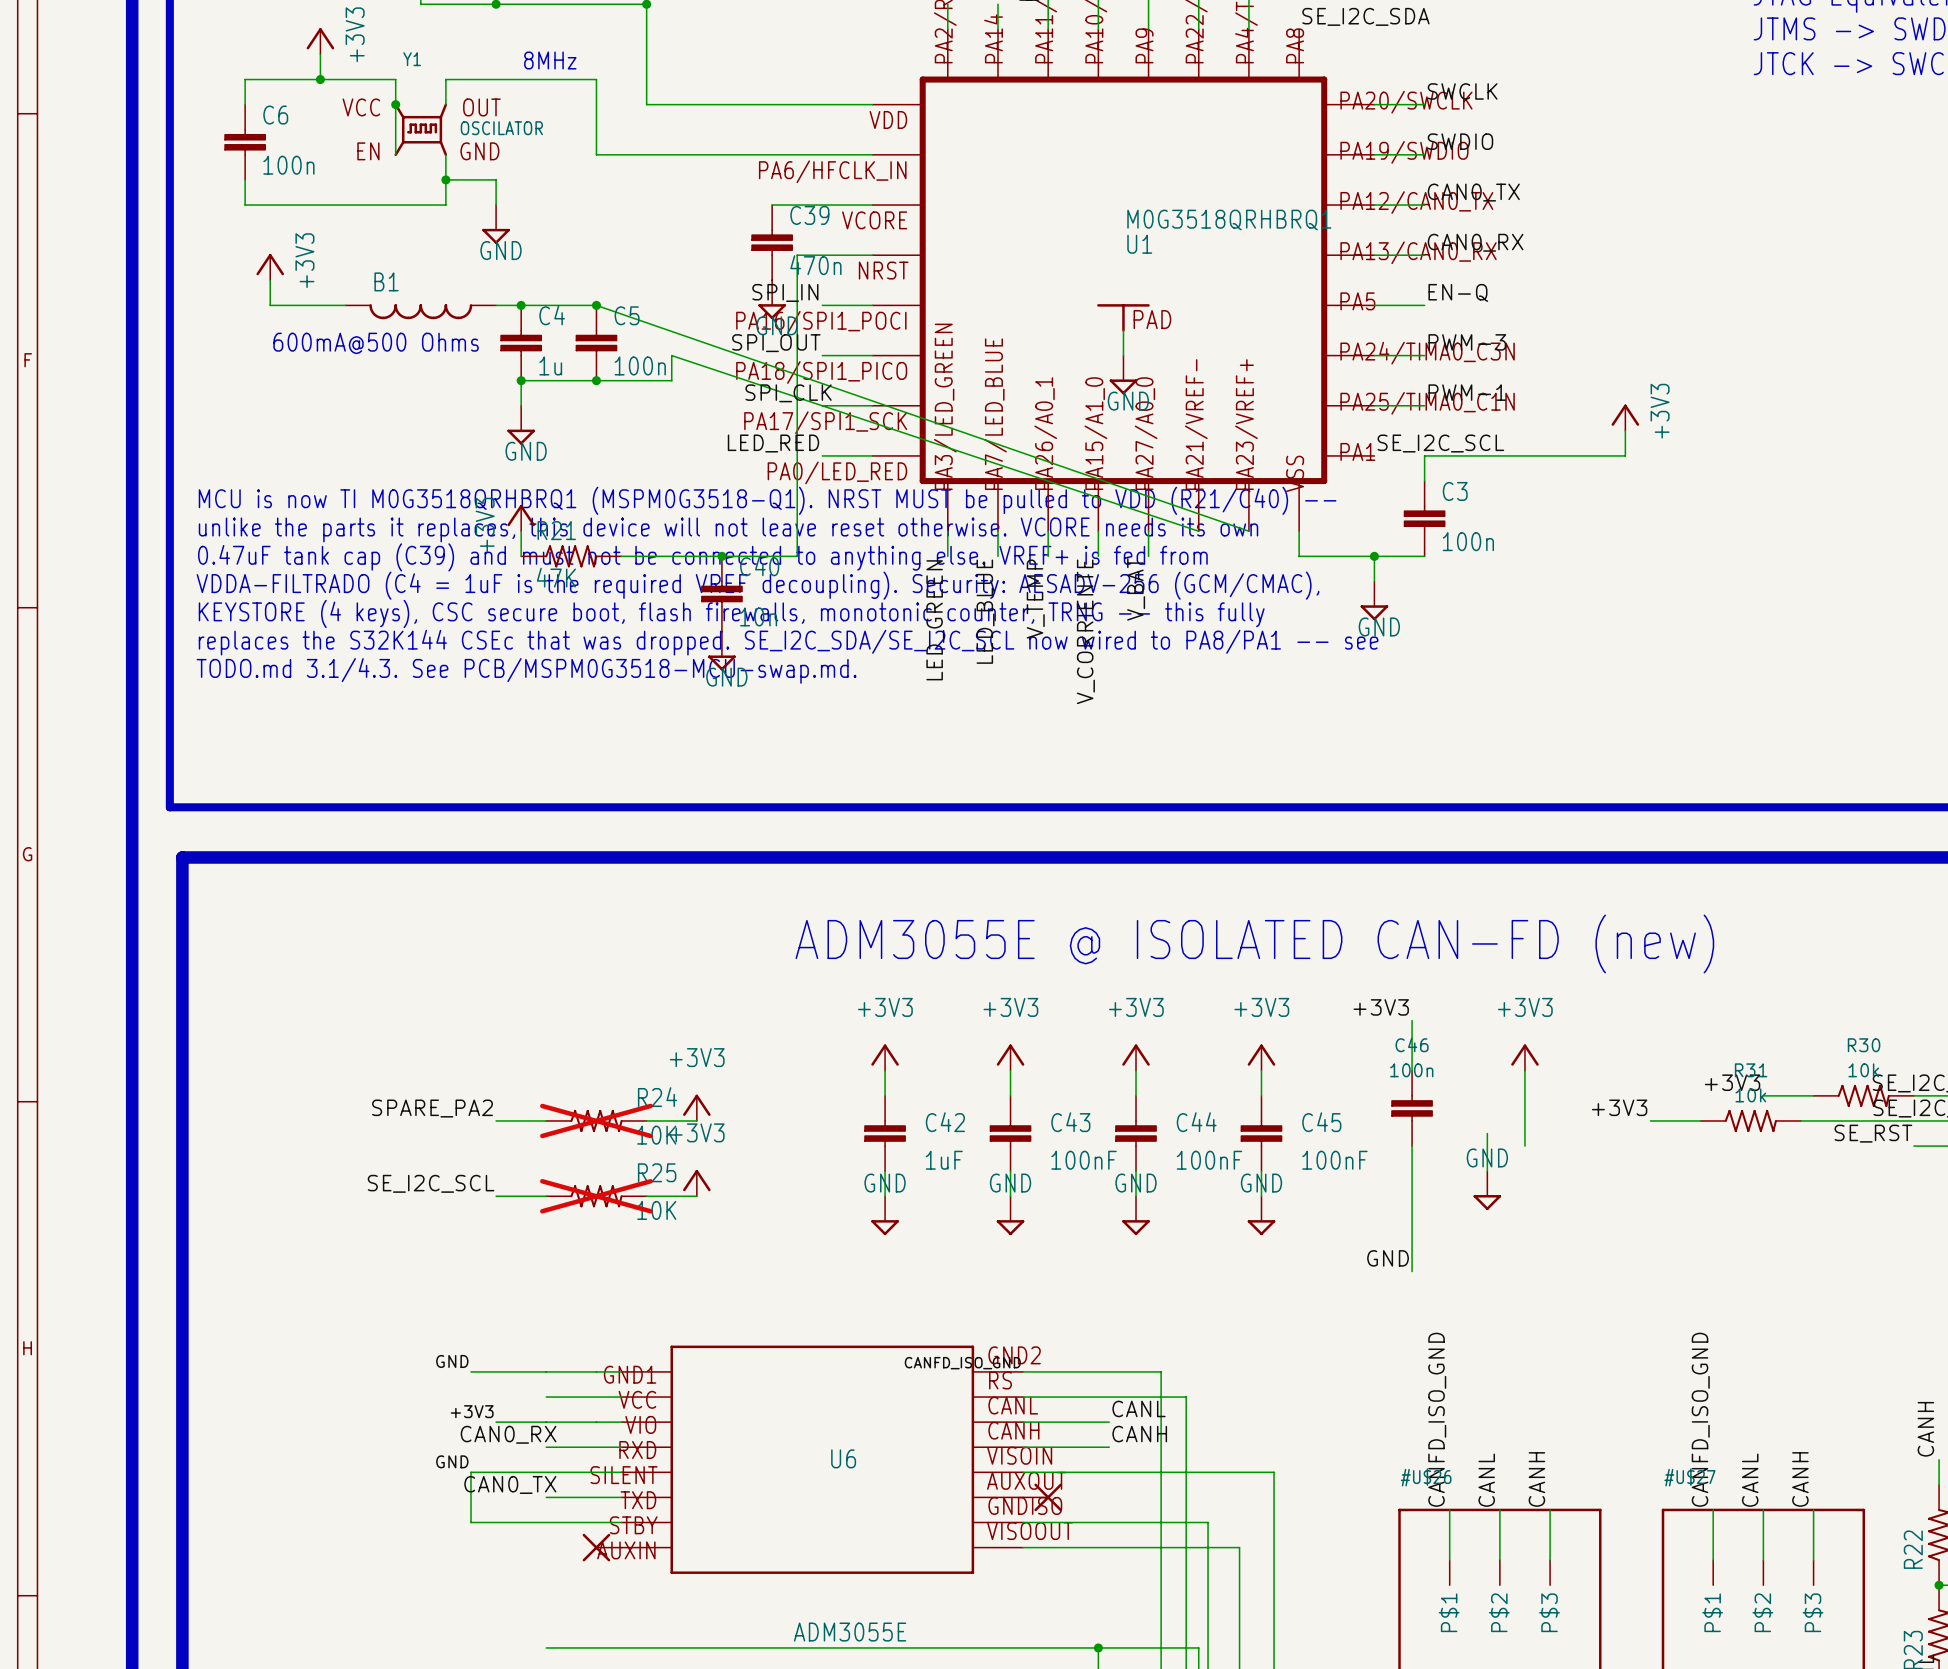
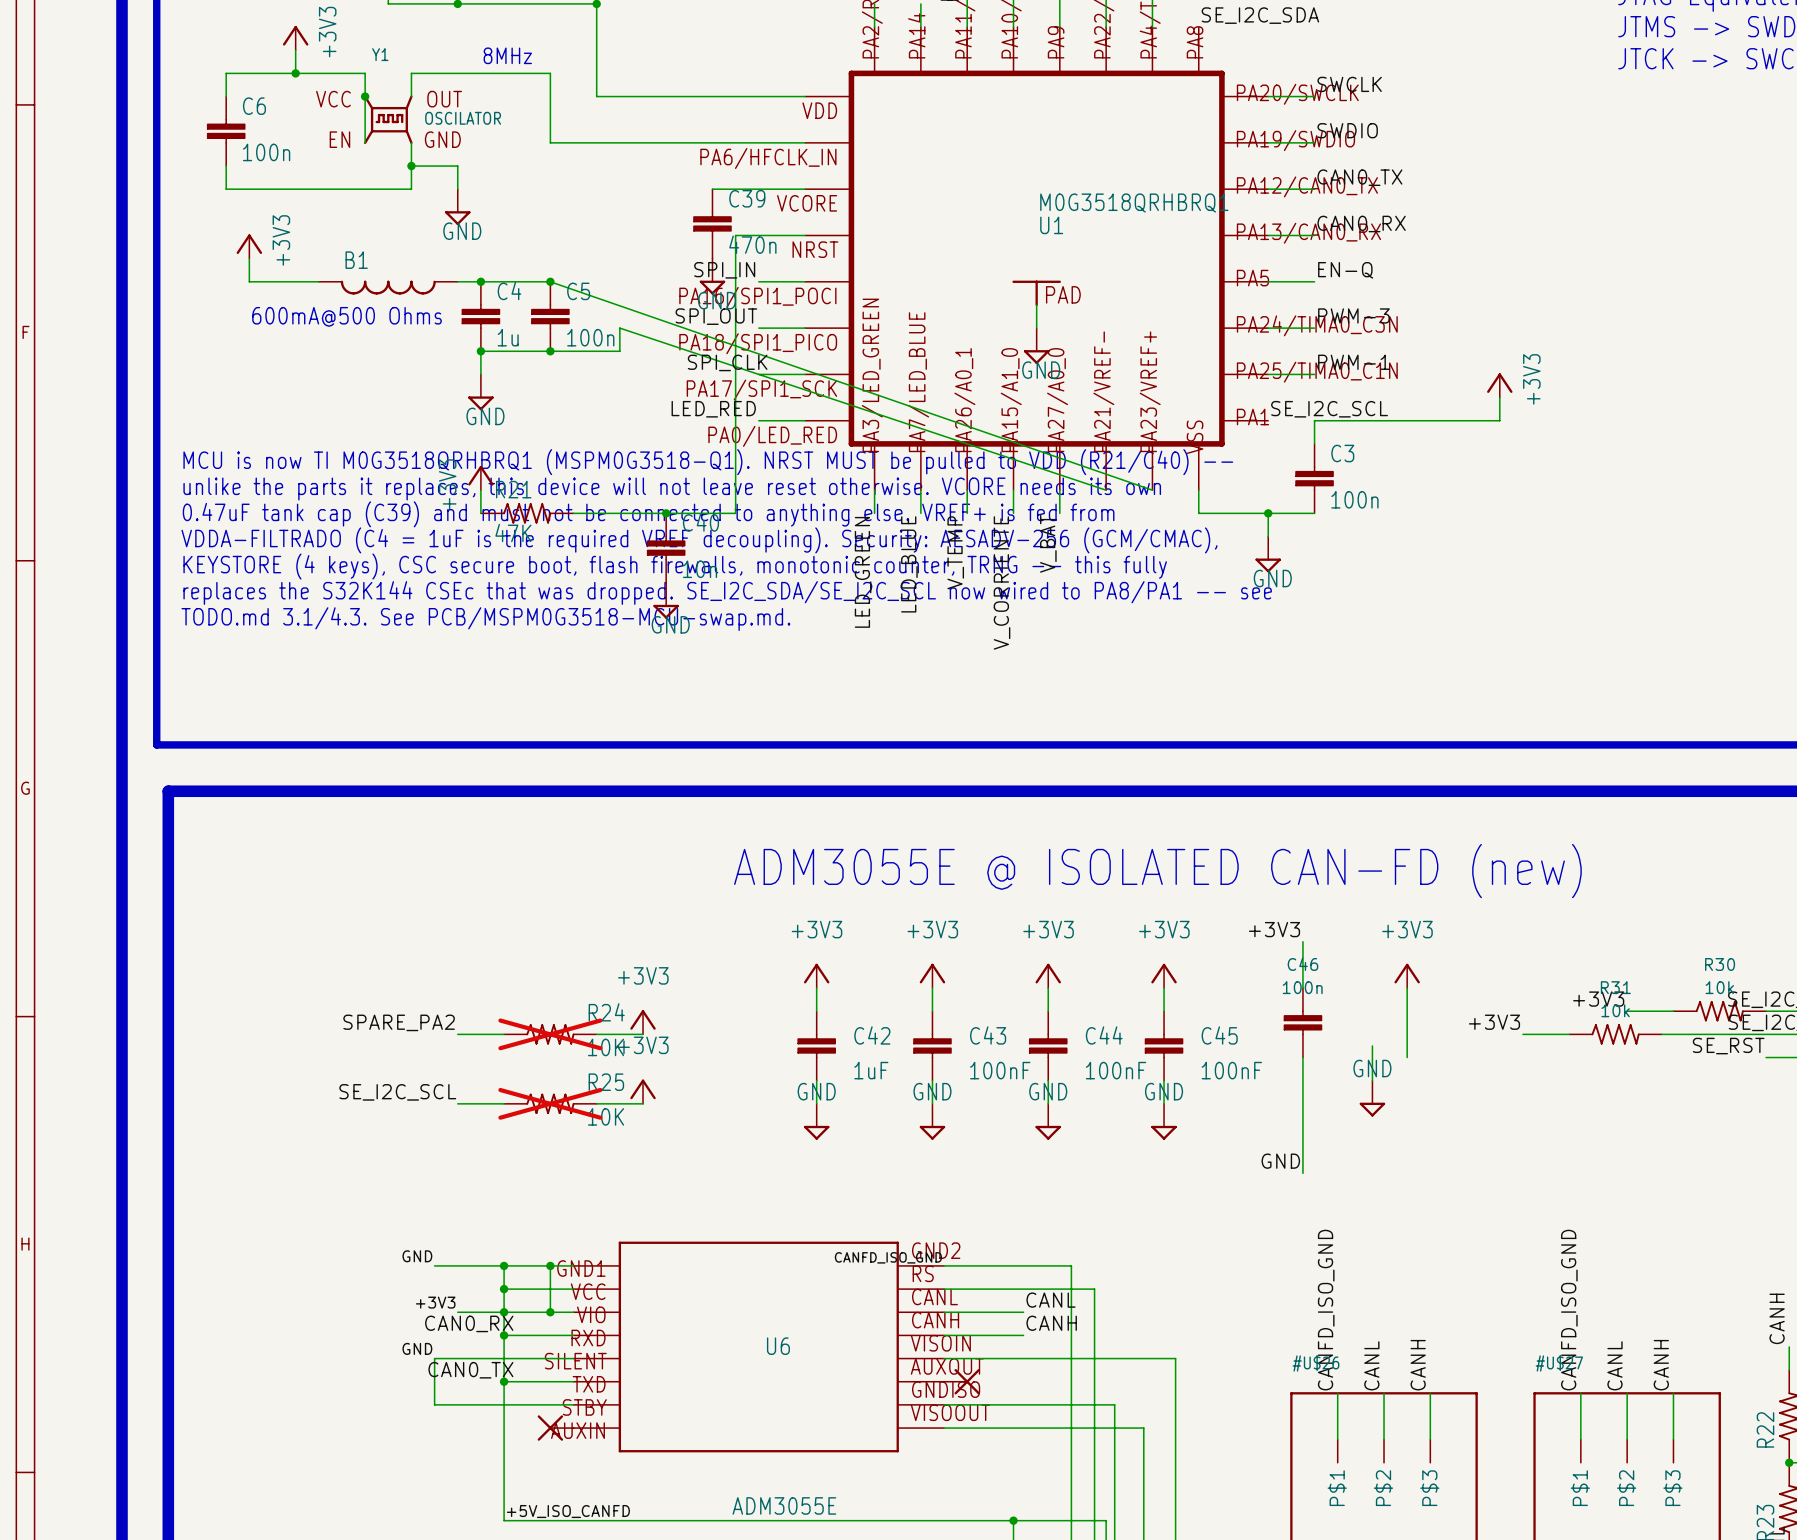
wire: none -> (504, 1265) (504, 1520)
junction: none -> (504, 1265)
wire: none -> (550, 1265) (550, 1312)
junction: none -> (550, 1265)
junction: none -> (504, 1289)
junction: none -> (504, 1312)
junction: none -> (550, 1312)
junction: none -> (504, 1335)
junction: none -> (504, 1381)
label: none -> +5V_ISO_CANFD (568, 1511)

